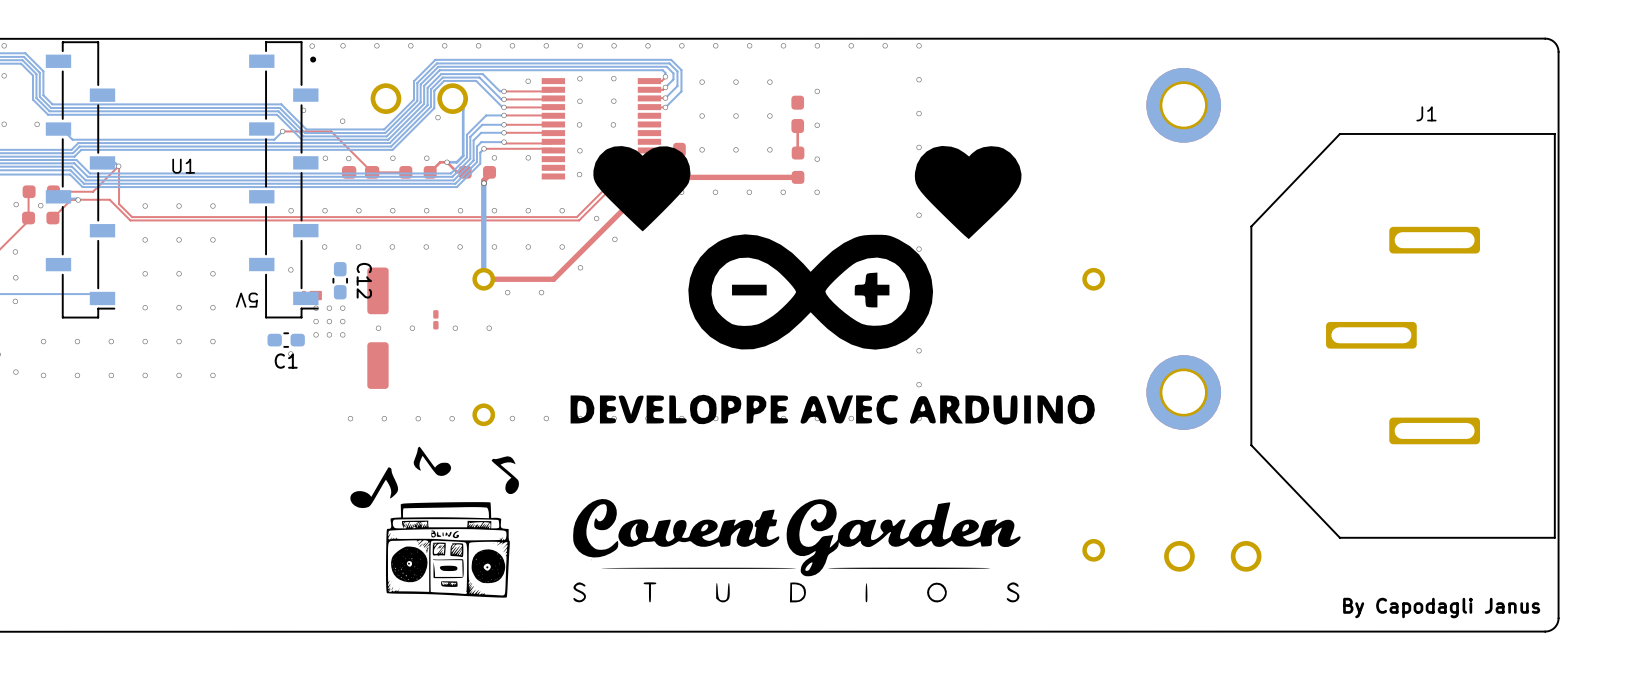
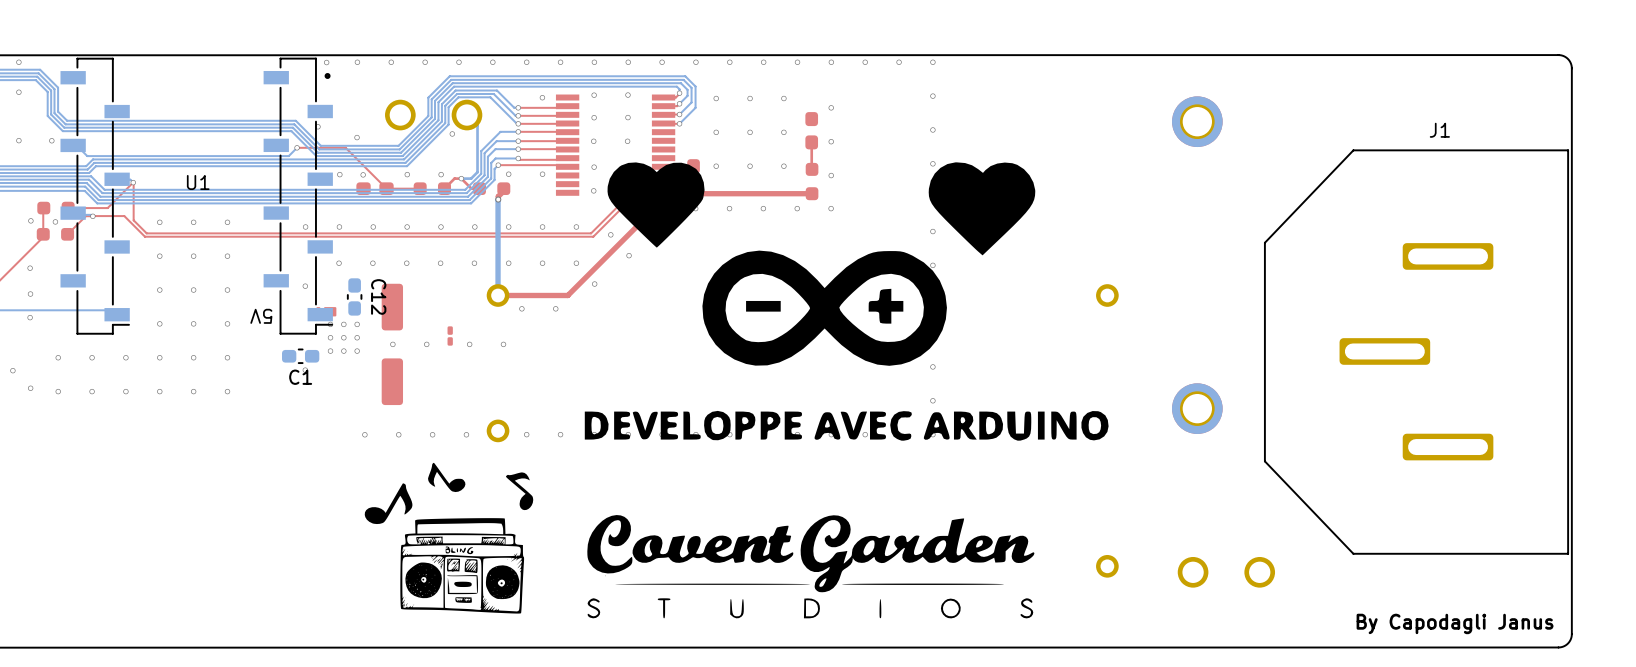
part footprint: [1146, 67, 1222, 143] -> [1172, 96, 1223, 148]
part footprint: [1146, 355, 1222, 430] -> [1172, 383, 1223, 434]

